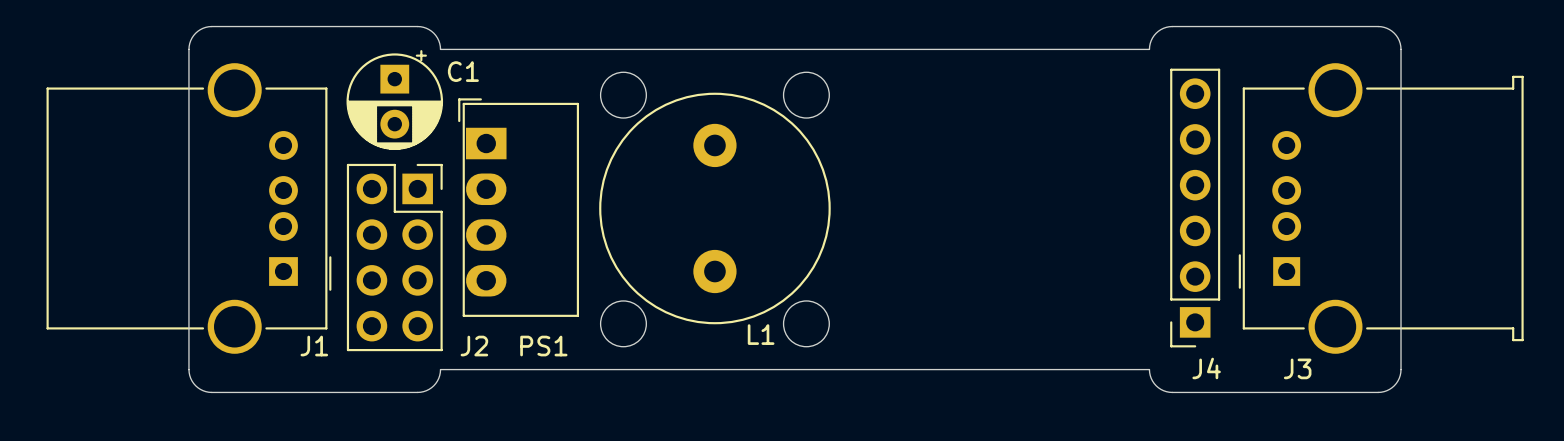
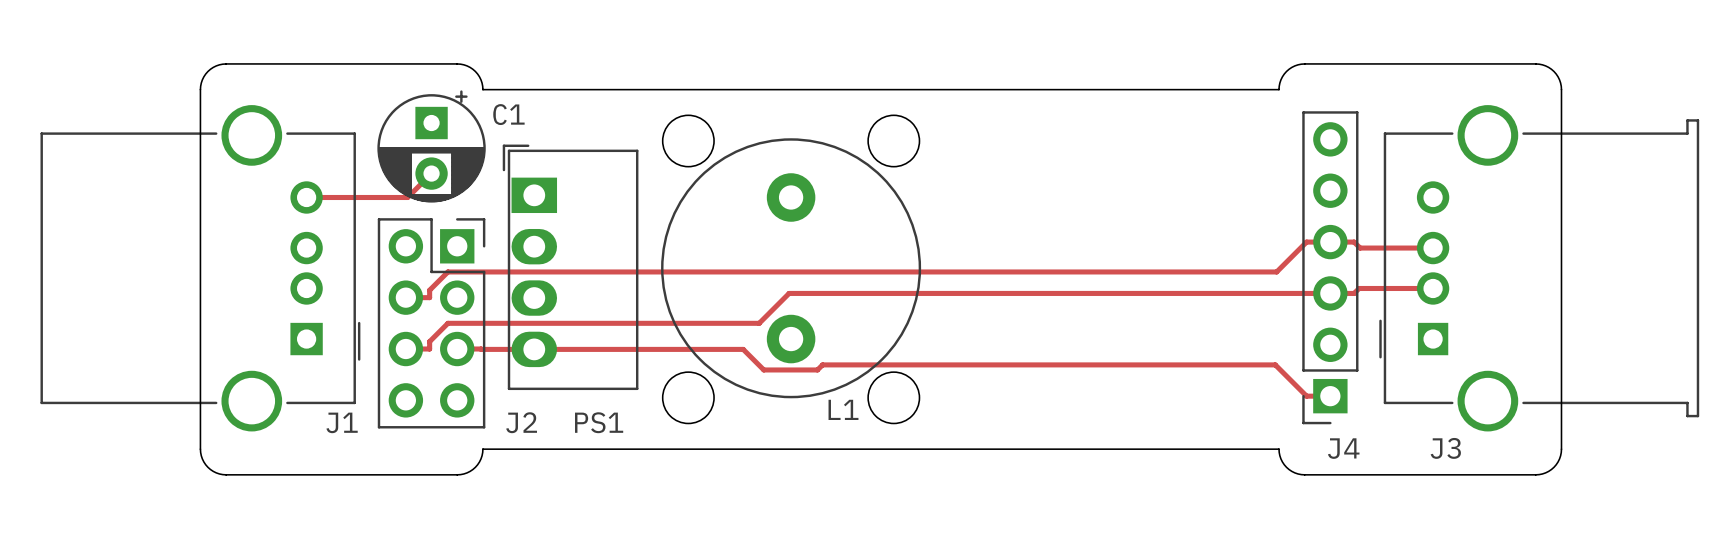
track: none -> (431, 173) (407, 197) (306, 197)
track: none -> (1433, 248) (1360, 248) (1354, 242) (1306, 242) (1276, 271) (447, 271) (429, 290) (429, 297) (405, 297)
track: none -> (1433, 288) (1359, 288) (1354, 293) (789, 293) (759, 323) (447, 323) (429, 341) (429, 349) (405, 349)
track: none -> (457, 349) (743, 349) (763, 369) (817, 369) (822, 364) (1275, 364) (1306, 396) (1330, 396)

